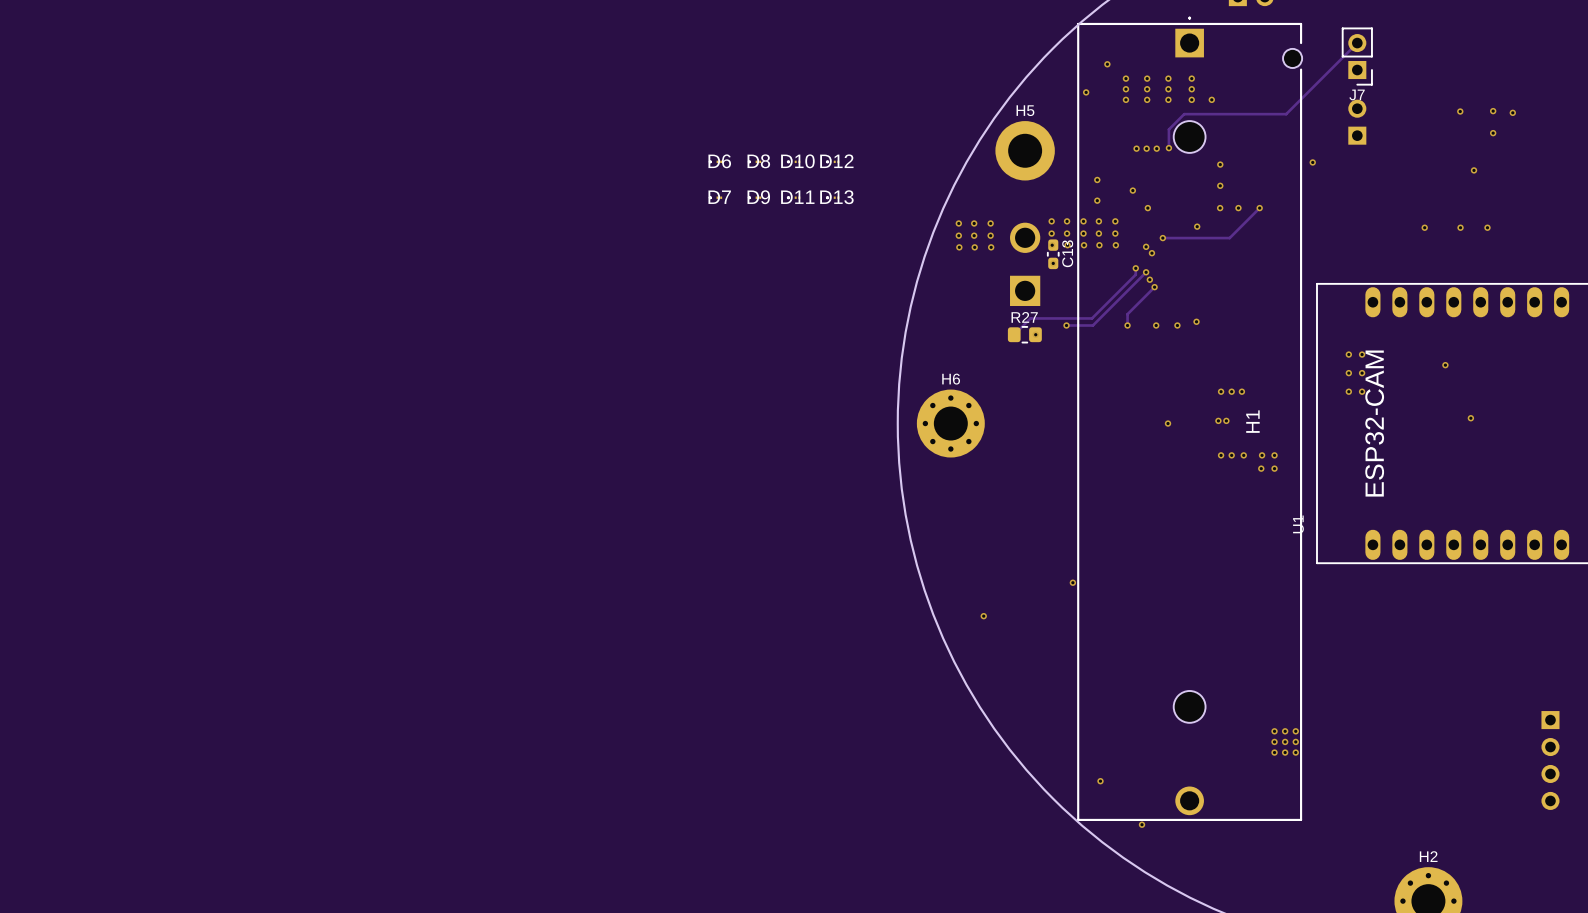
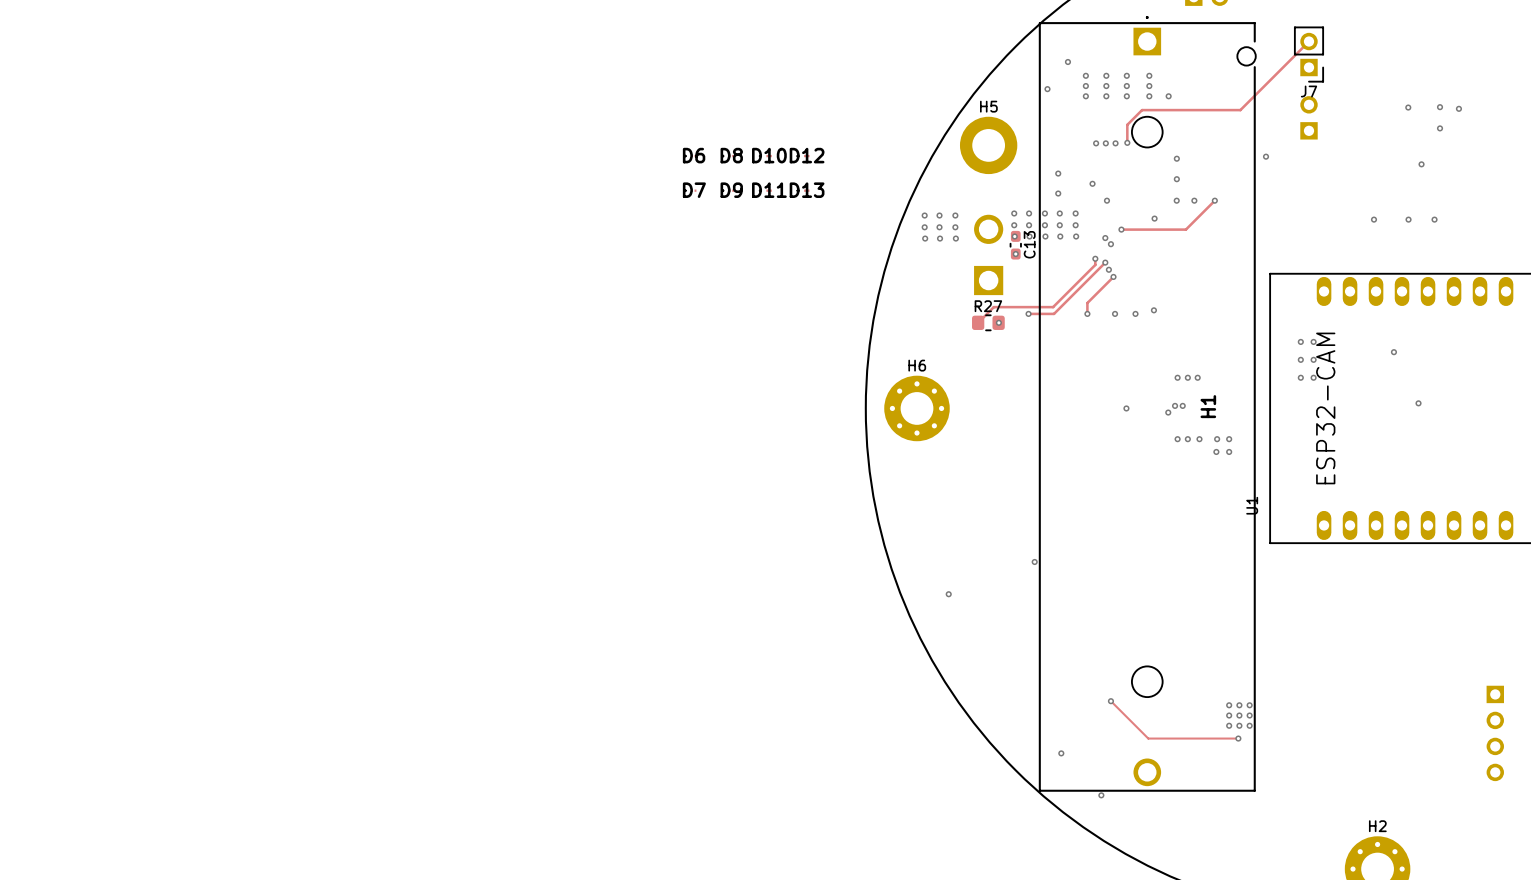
via: none -> (1168, 412)
track: none -> (1110, 701) (1148, 738) (1238, 738)
via: none -> (1110, 701)
via: none -> (1238, 738)

